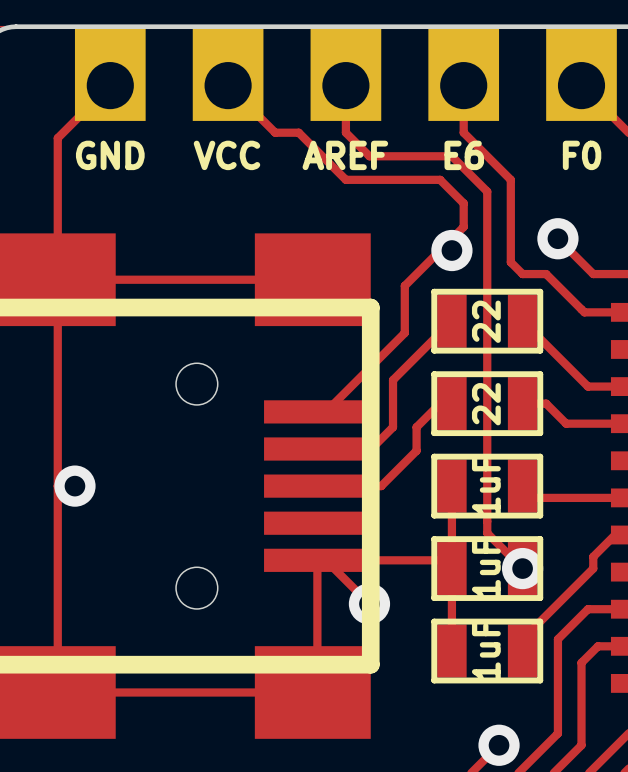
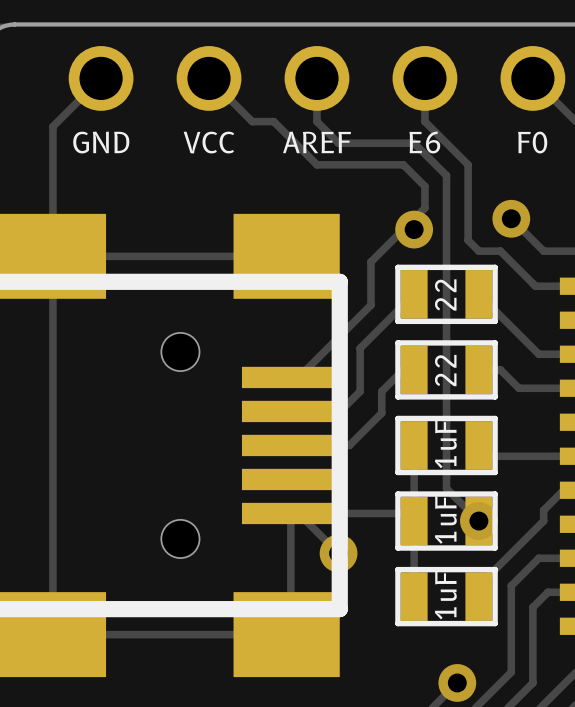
part footprint: [74, 26, 617, 121] -> [68, 46, 566, 111]
via: (74, 486) -> none

